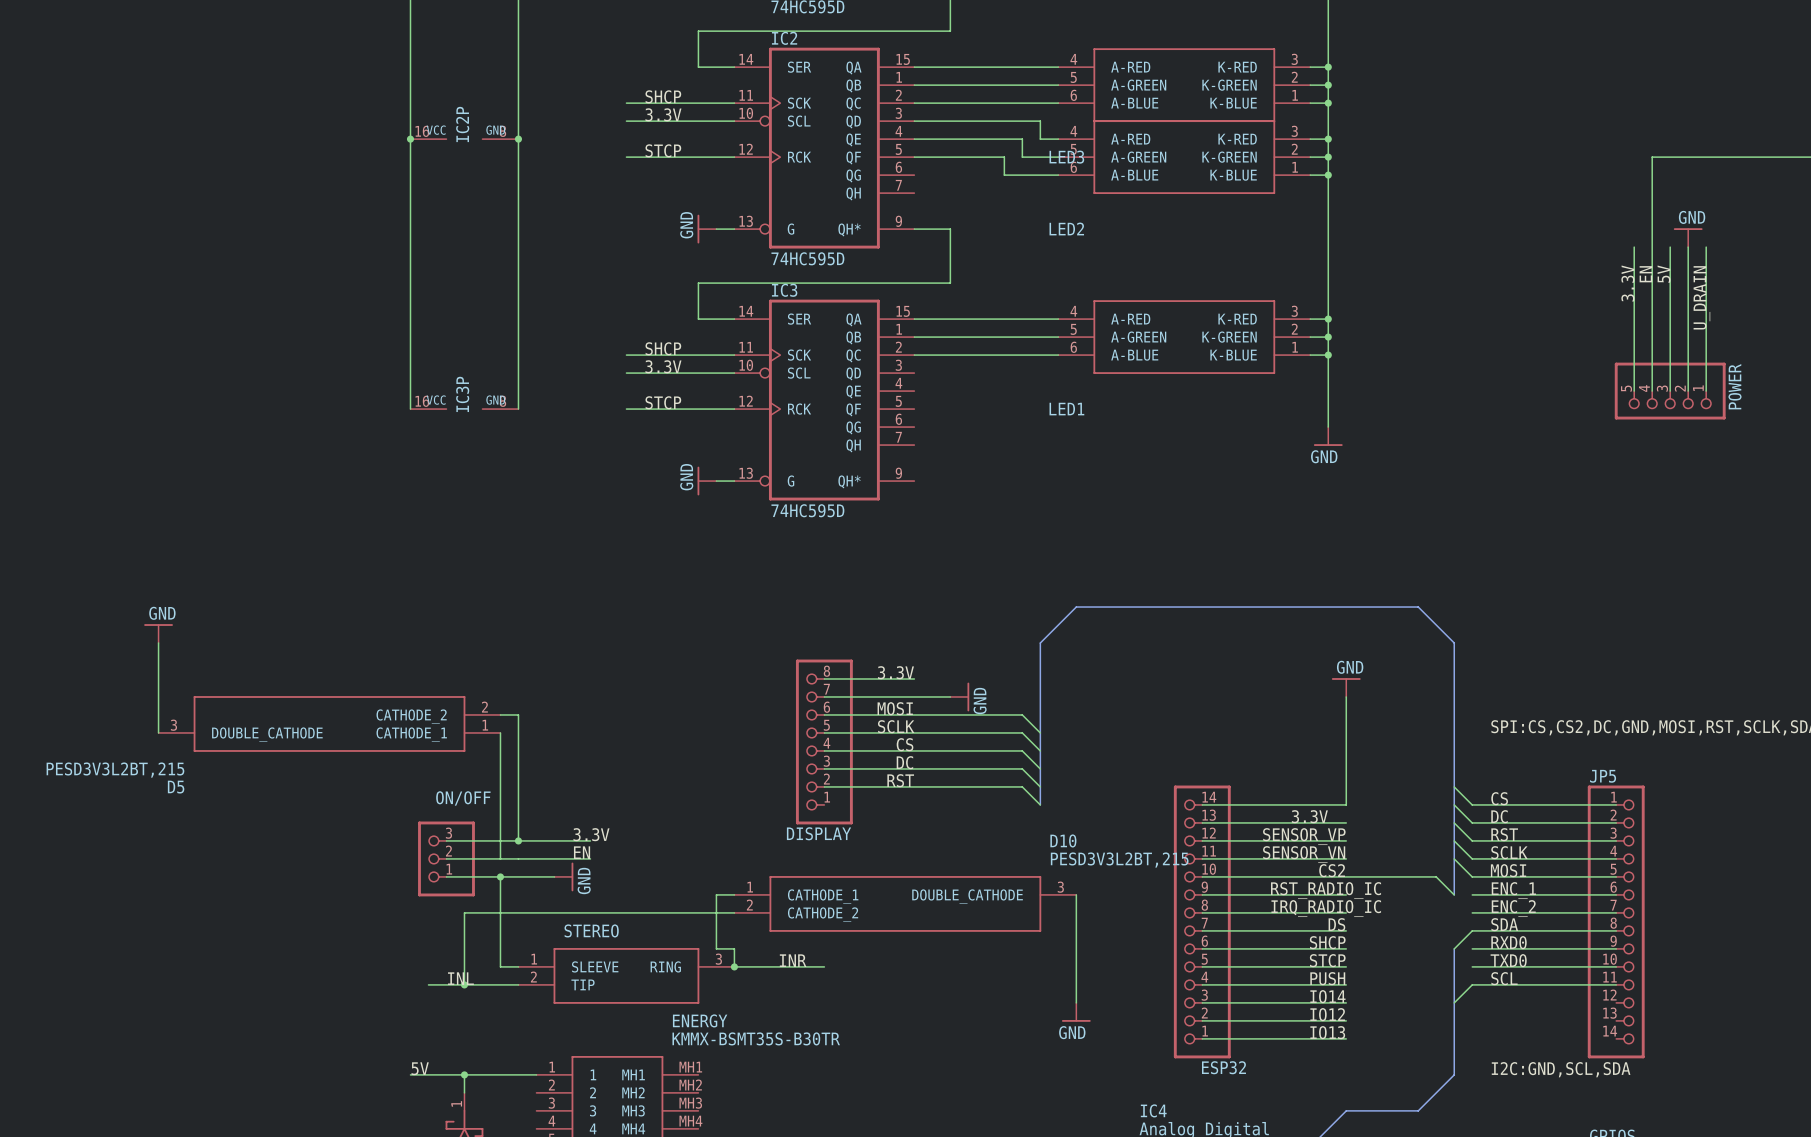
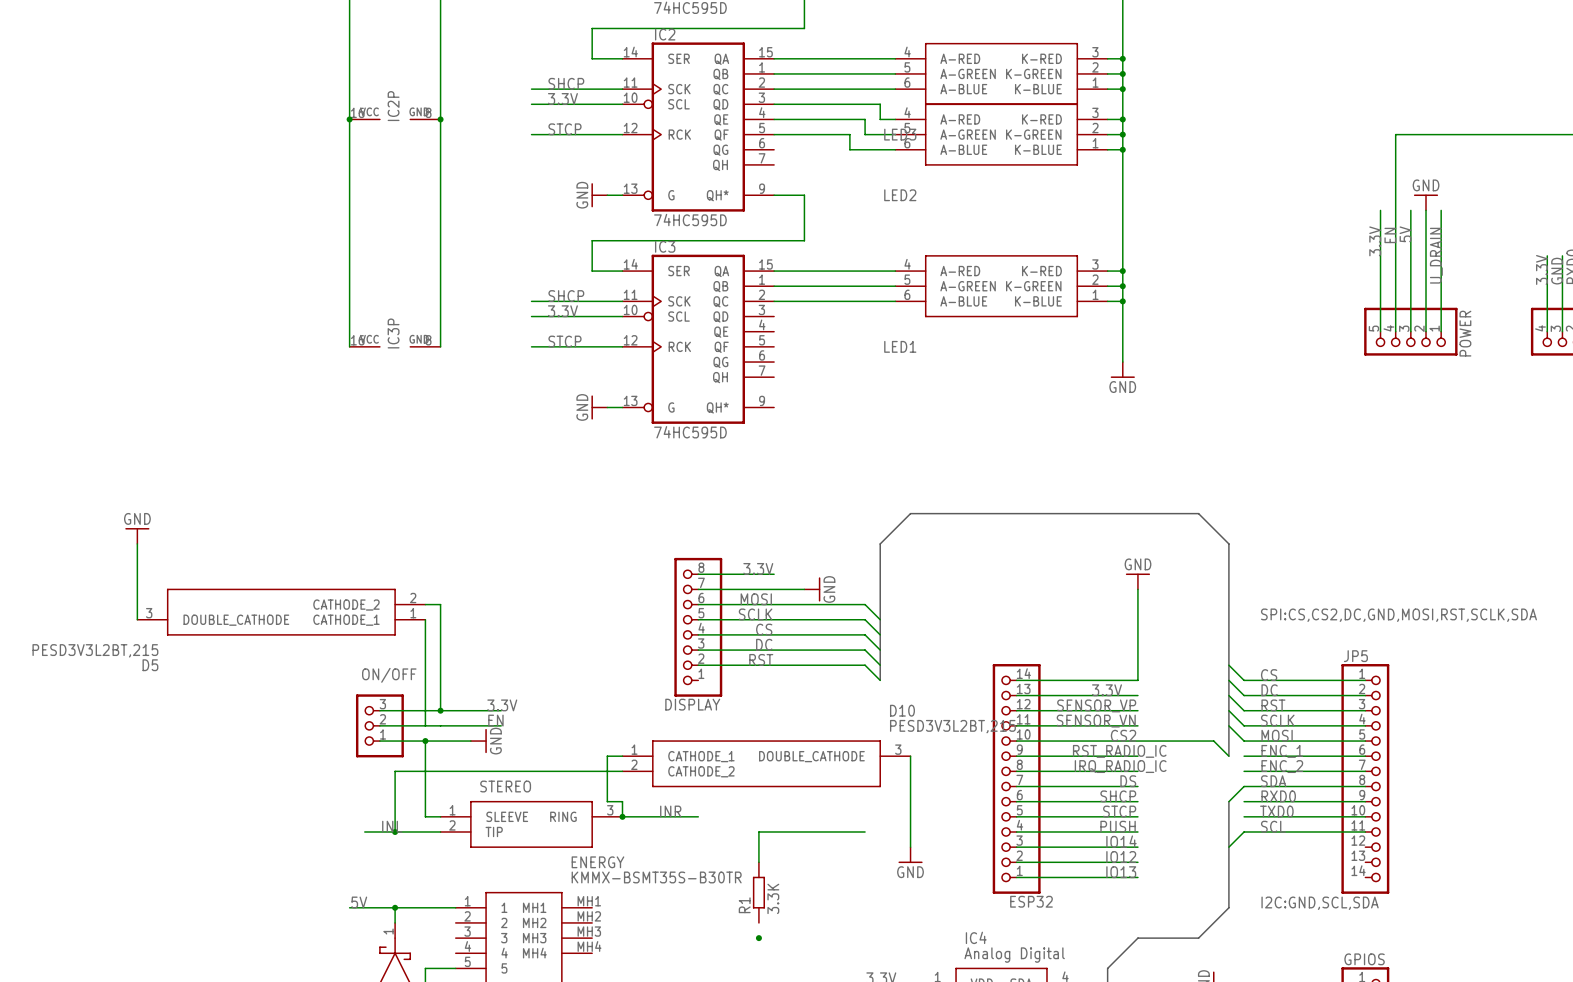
wire: none -> (865, 831) (758, 831) (758, 862)
R1: none -> 3.3K (758, 892)
junction: none -> (758, 938)

